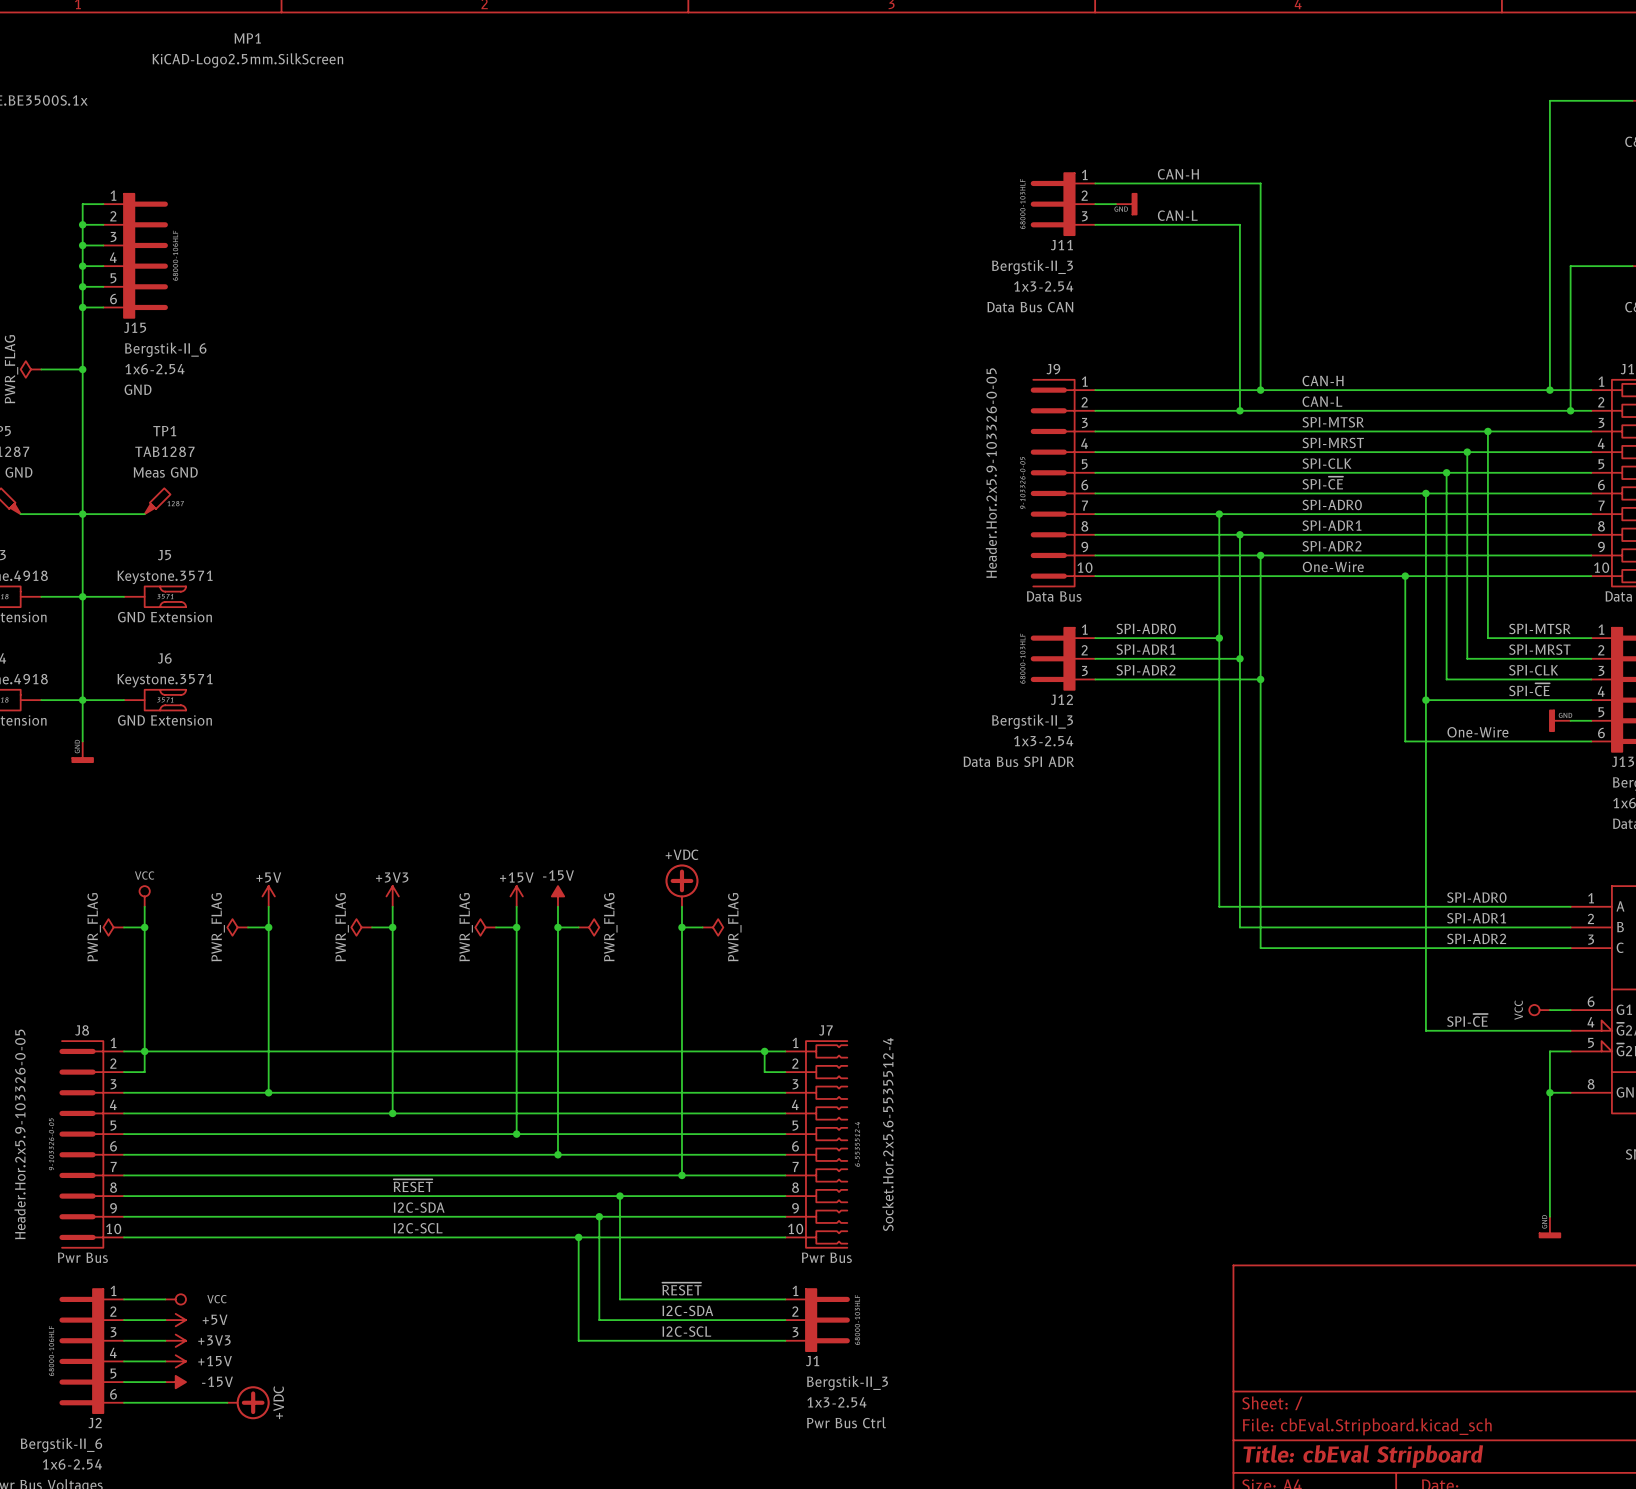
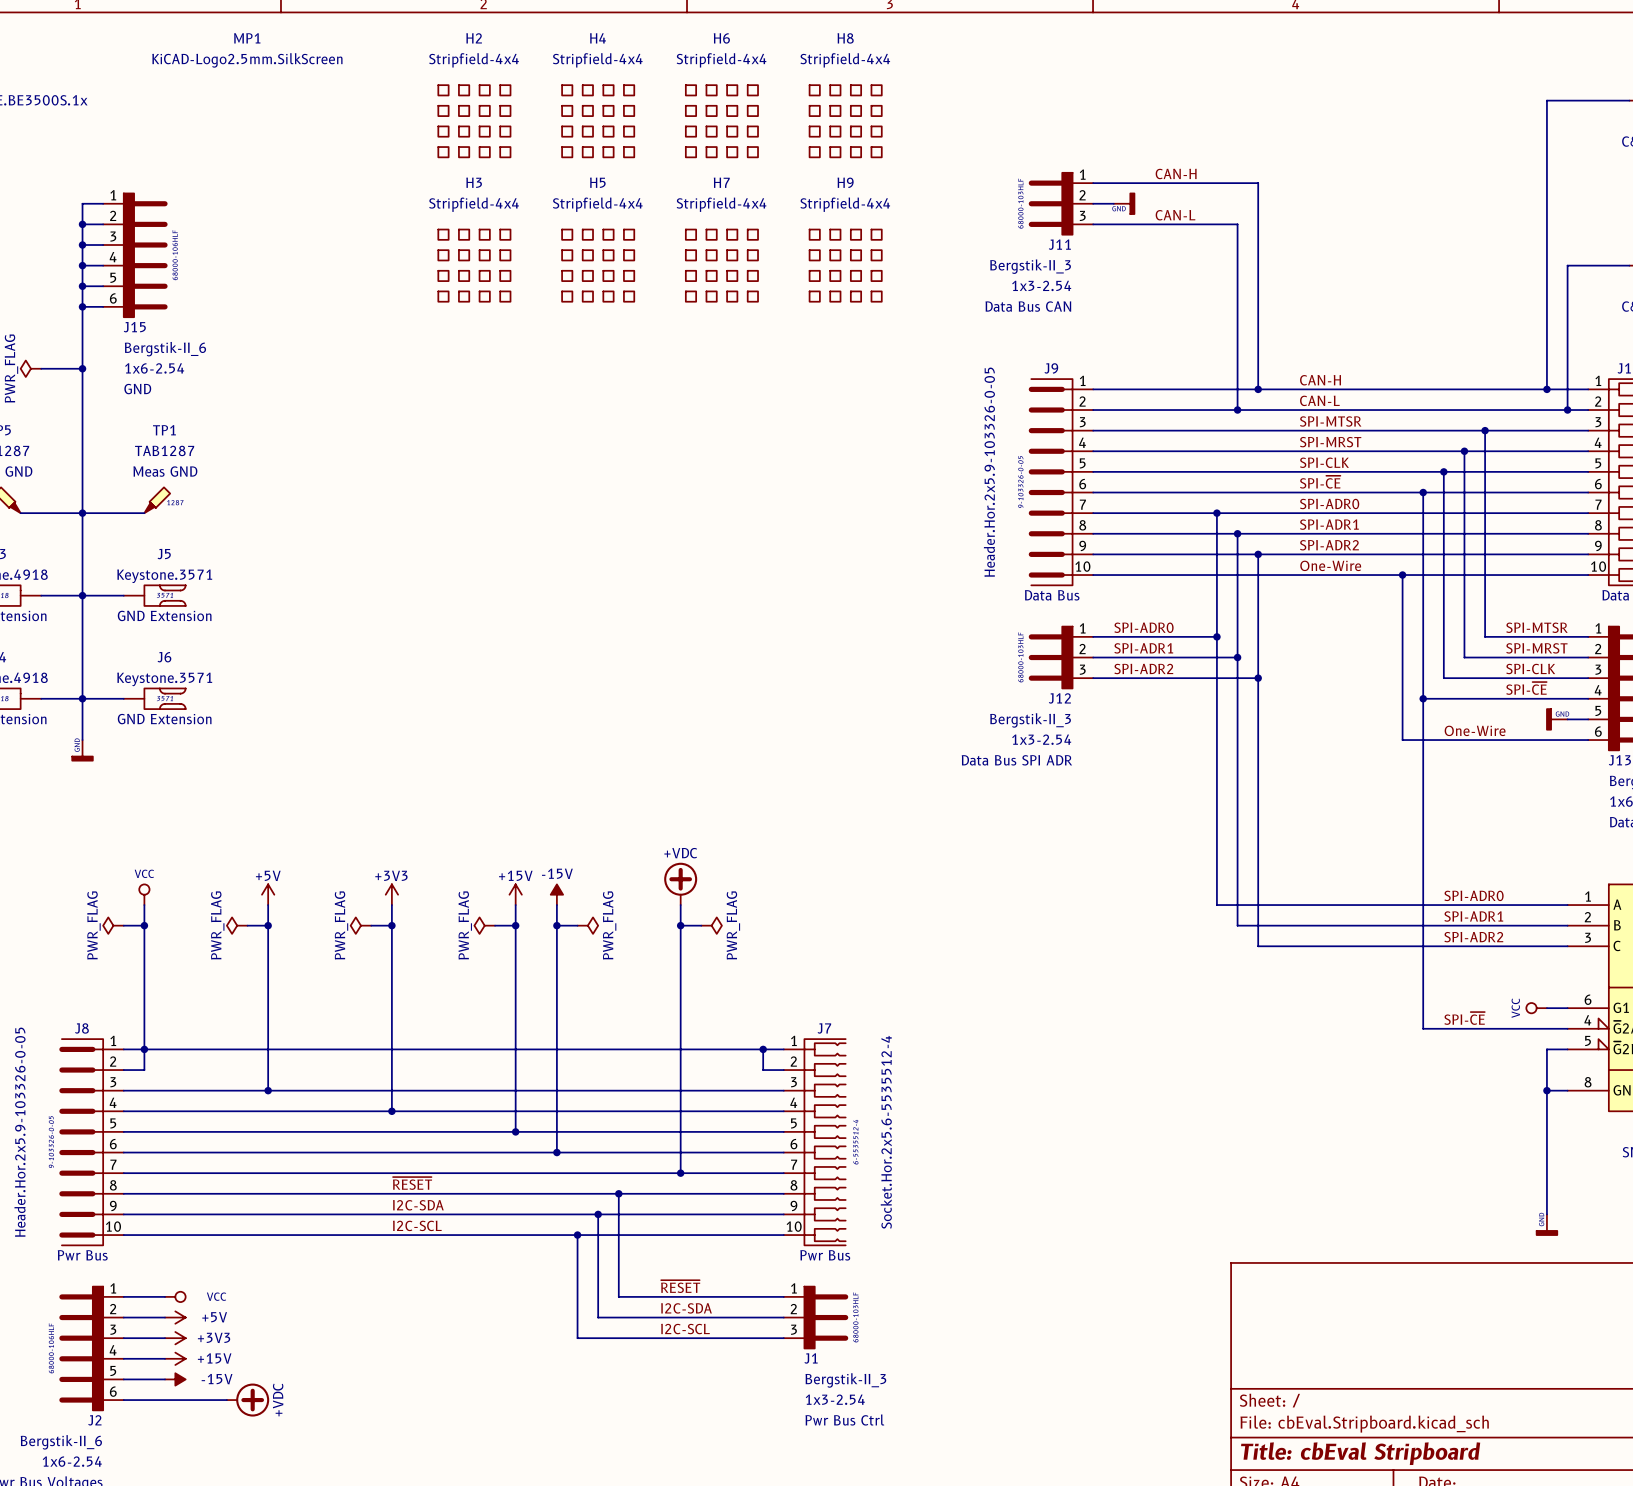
H2: none -> Stripfield-4x4 (474, 121)
H4: none -> Stripfield-4x4 (598, 121)
H6: none -> Stripfield-4x4 (721, 121)
H8: none -> Stripfield-4x4 (845, 121)
H3: none -> Stripfield-4x4 (474, 265)
H5: none -> Stripfield-4x4 (598, 265)
H7: none -> Stripfield-4x4 (721, 265)
H9: none -> Stripfield-4x4 (845, 265)

